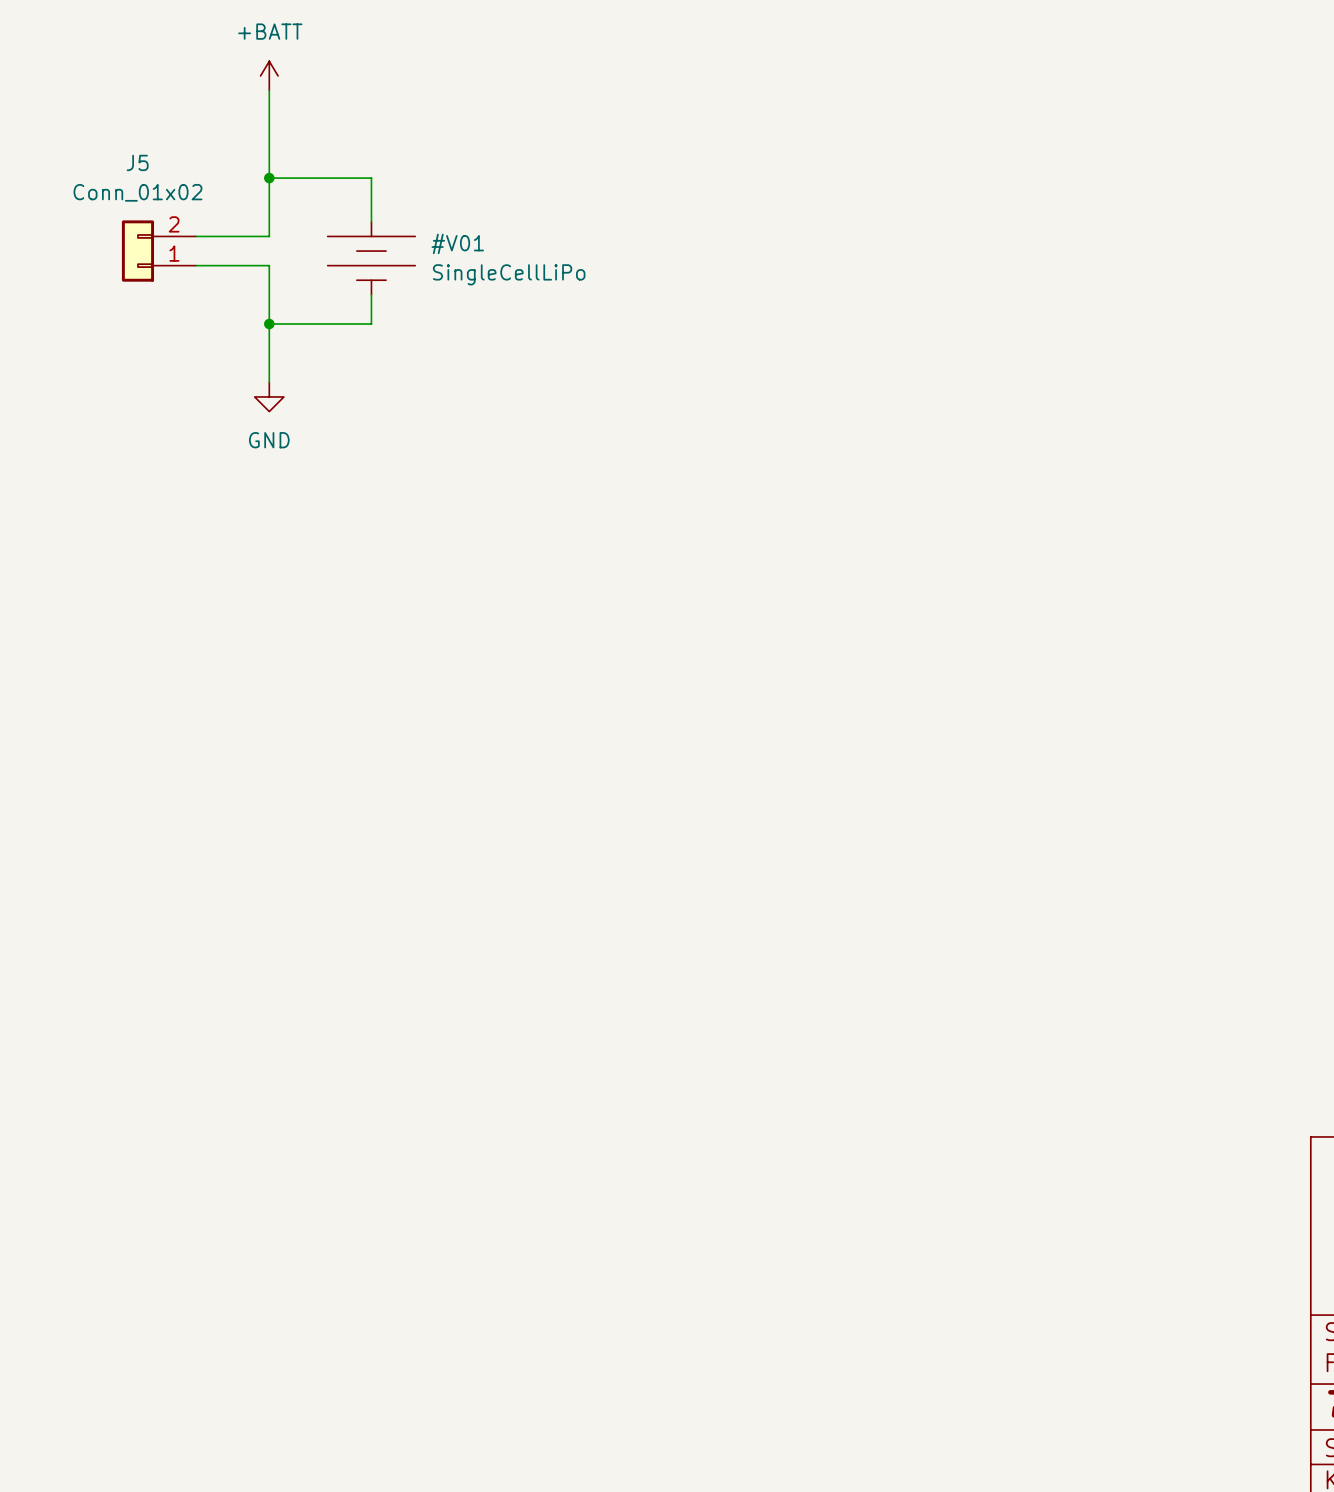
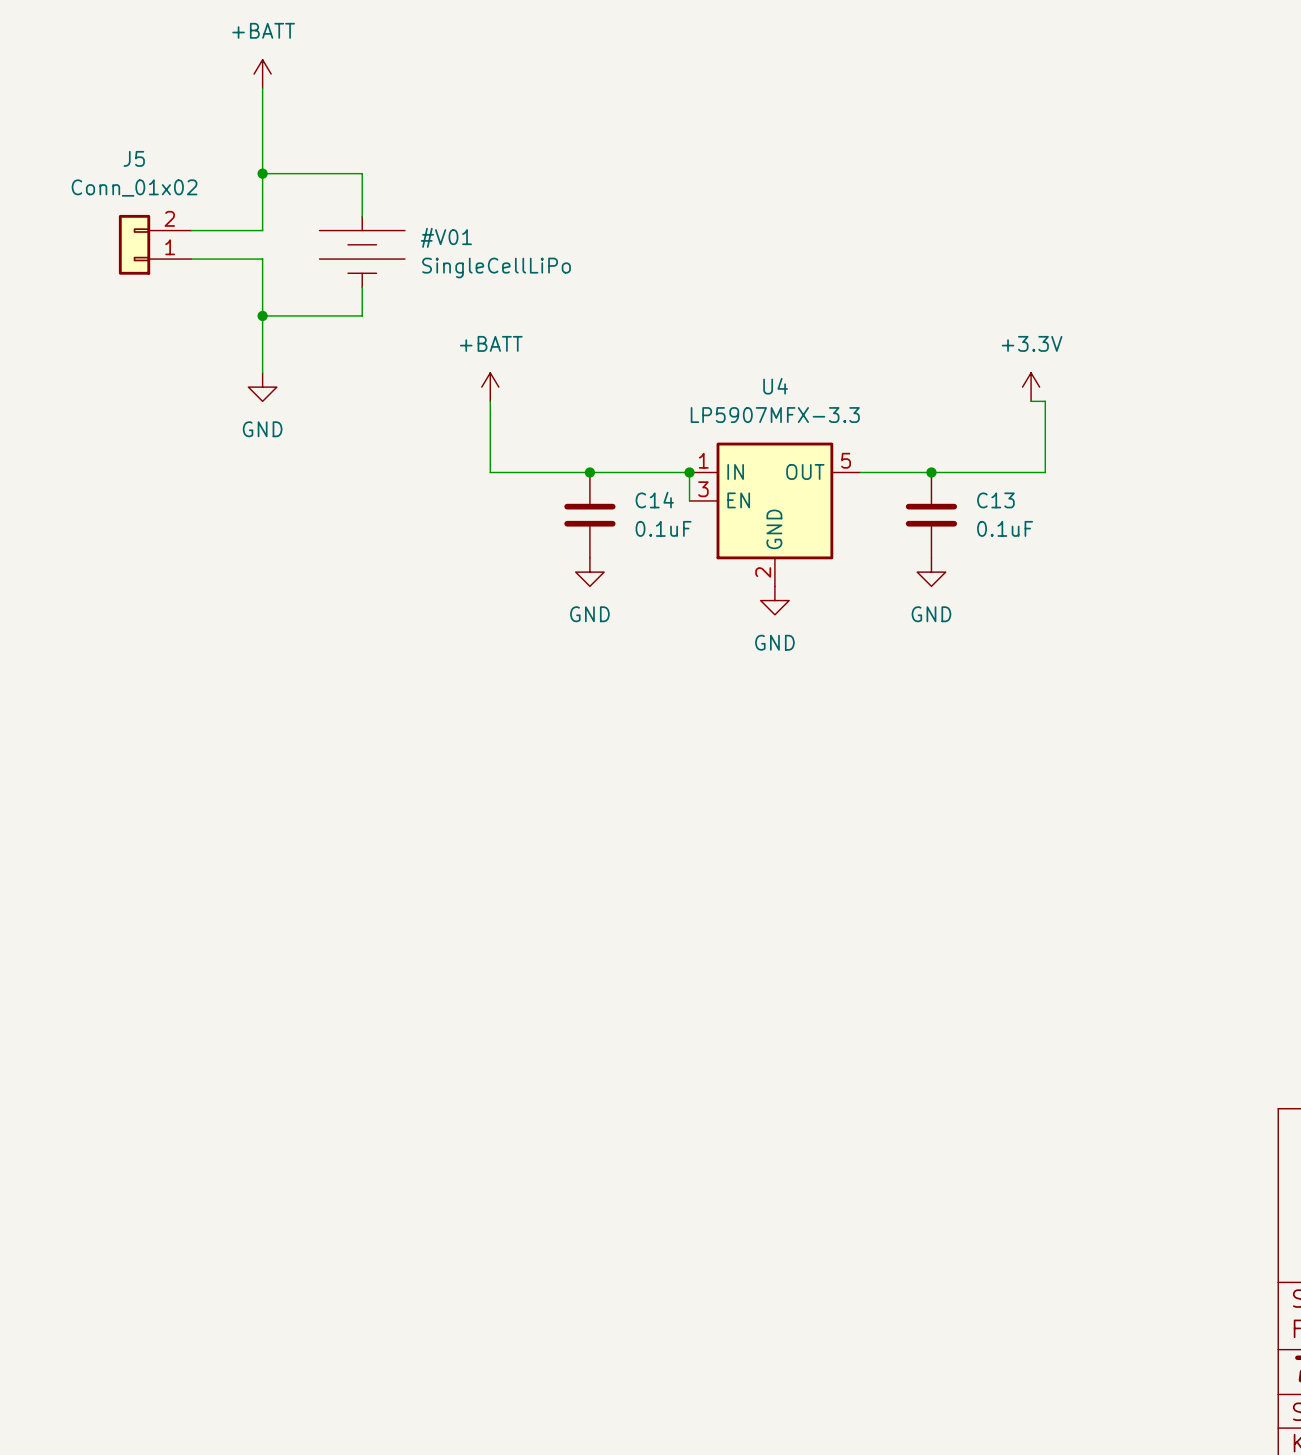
power symbol: none -> +BATT (490, 387)
power symbol: none -> +3.3V (1031, 387)
wire: none -> (490, 401) (490, 472) (689, 472) (689, 500)
wire: none -> (1031, 401) (1045, 401) (1045, 472) (860, 472)
junction: none -> (589, 472)
junction: none -> (689, 472)
junction: none -> (931, 472)
U4: none -> LP5907MFX-3.3 (774, 514)
C14: none -> 0.1uF (589, 515)
C13: none -> 0.1uF (931, 515)
power symbol: none -> GND (589, 572)
power symbol: none -> GND (931, 572)
power symbol: none -> GND (774, 600)

